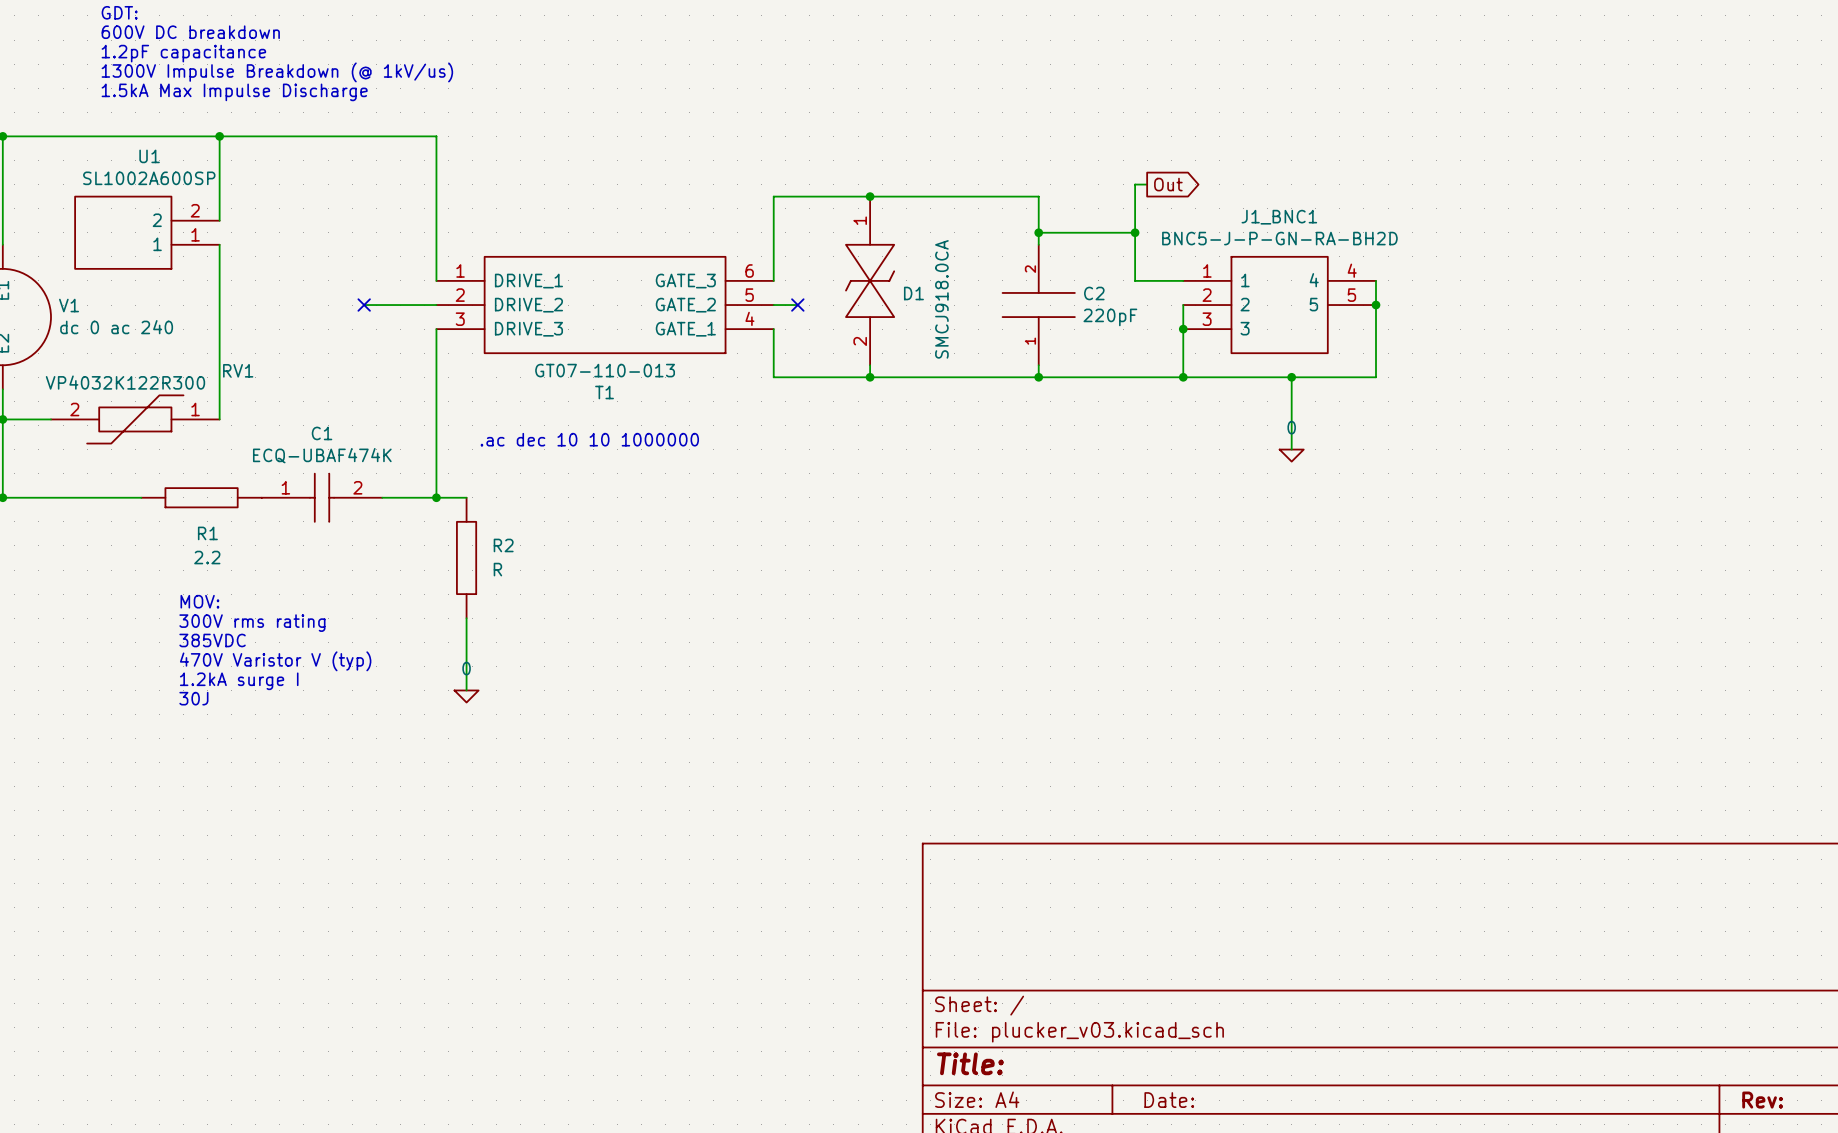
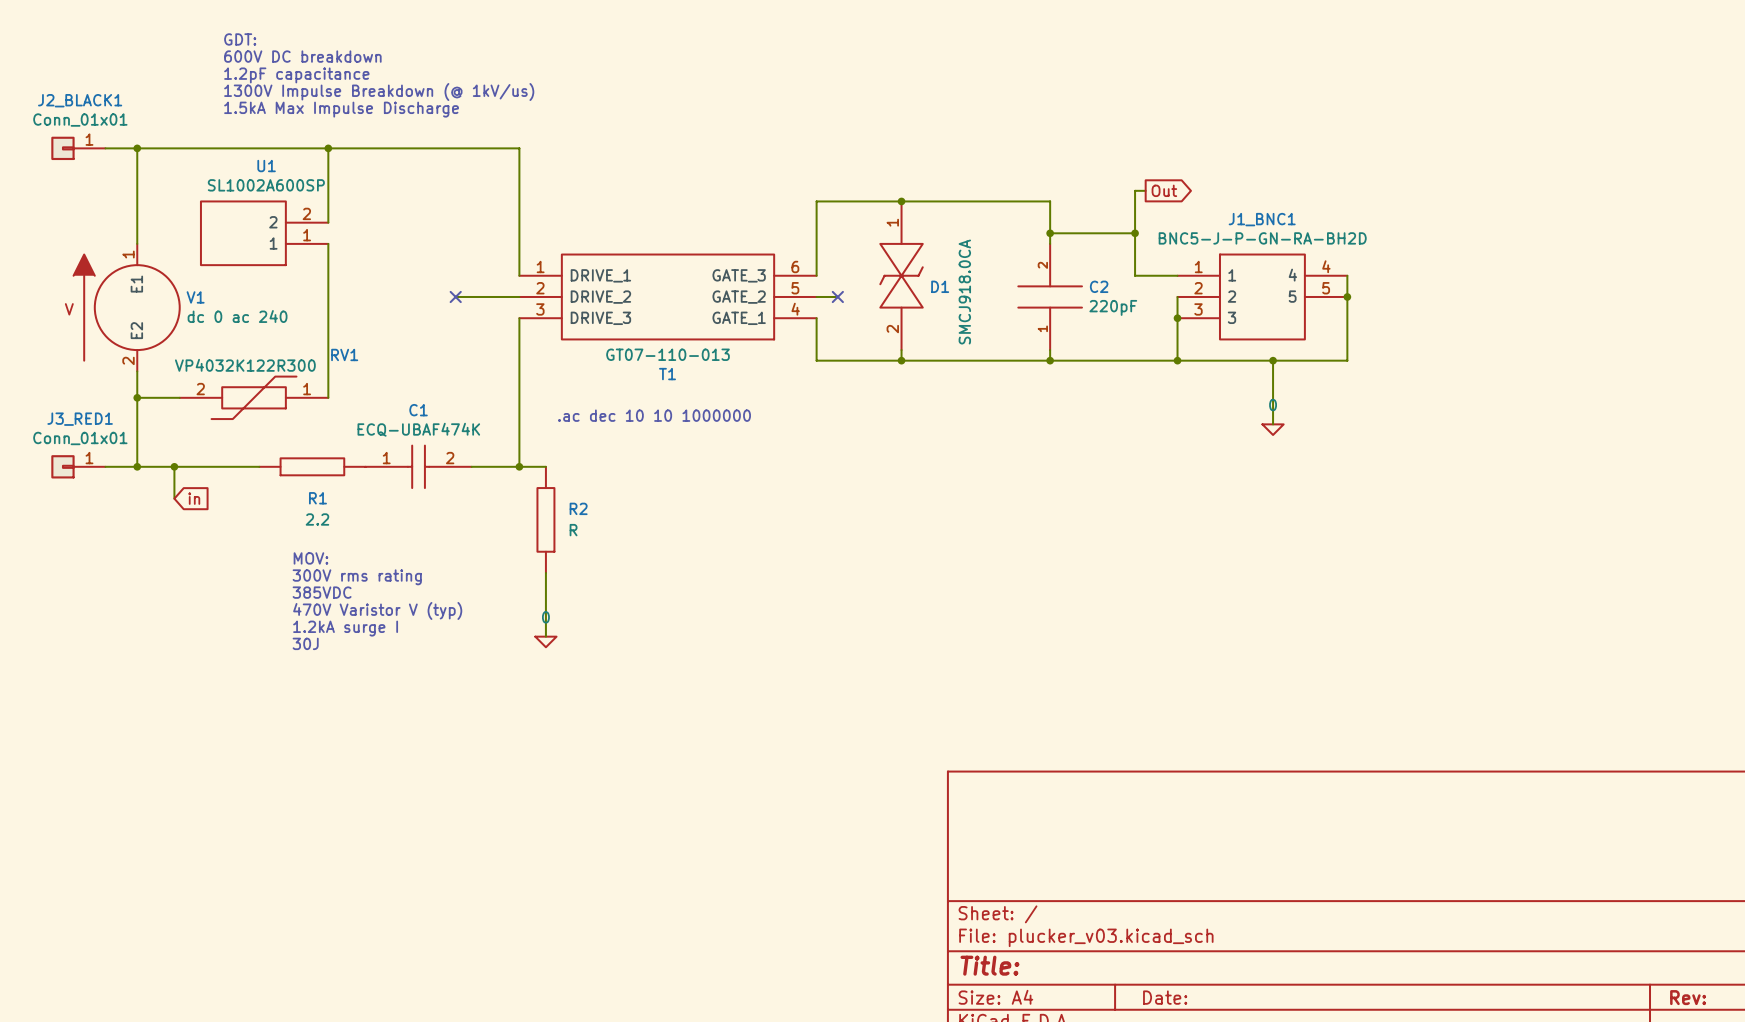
wire: none -> (174, 466) (174, 498)
junction: none -> (174, 466)
global label: none -> in (194, 498)

